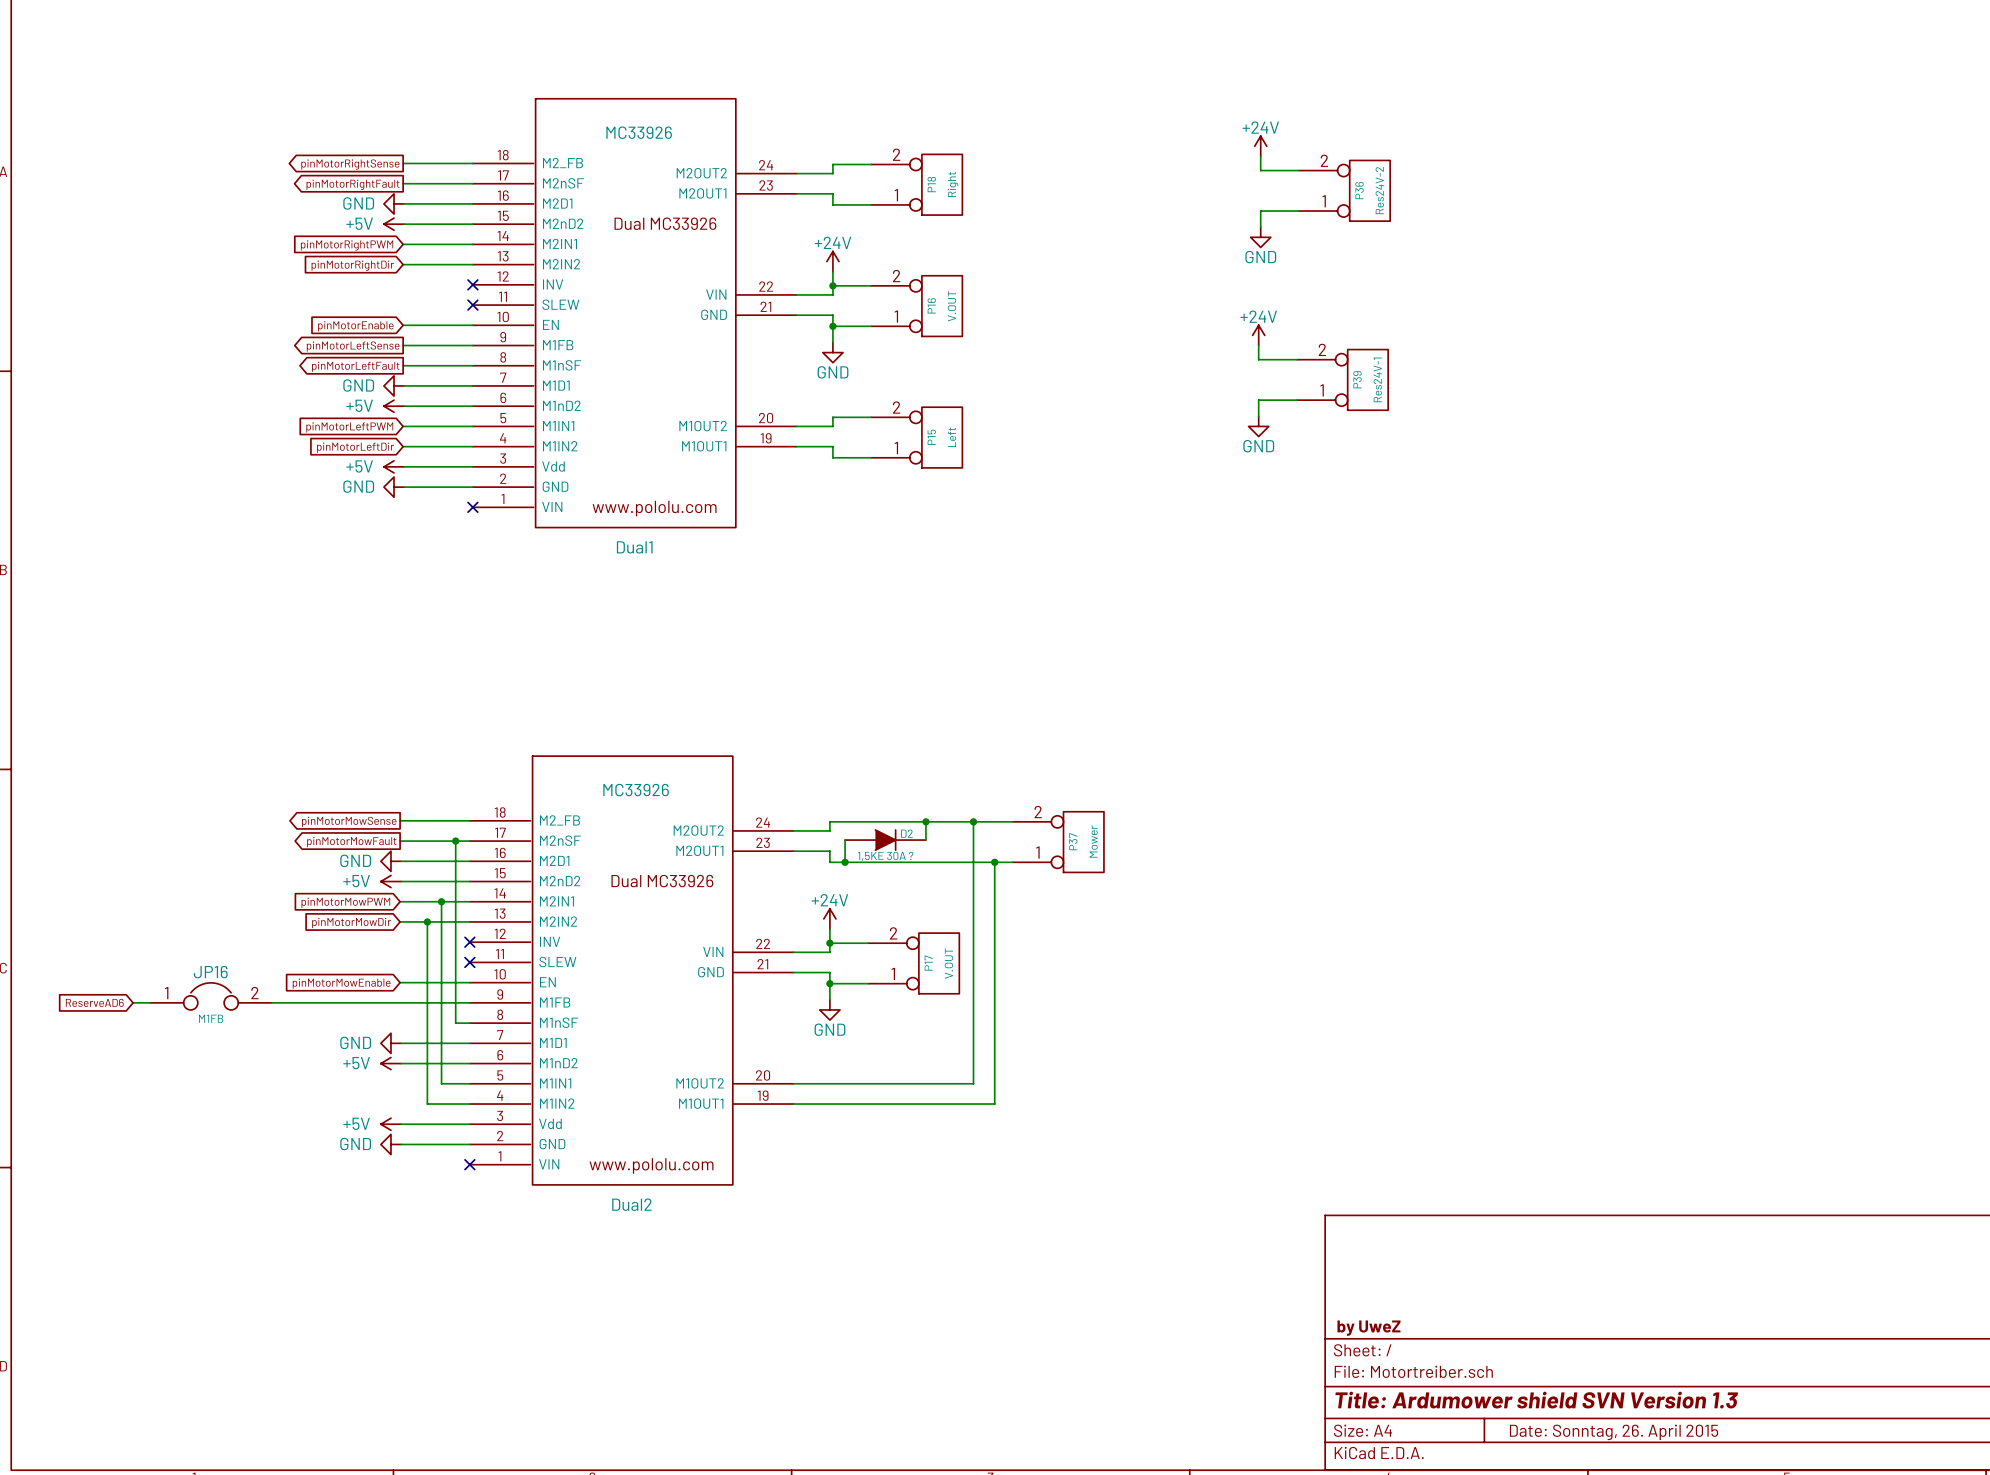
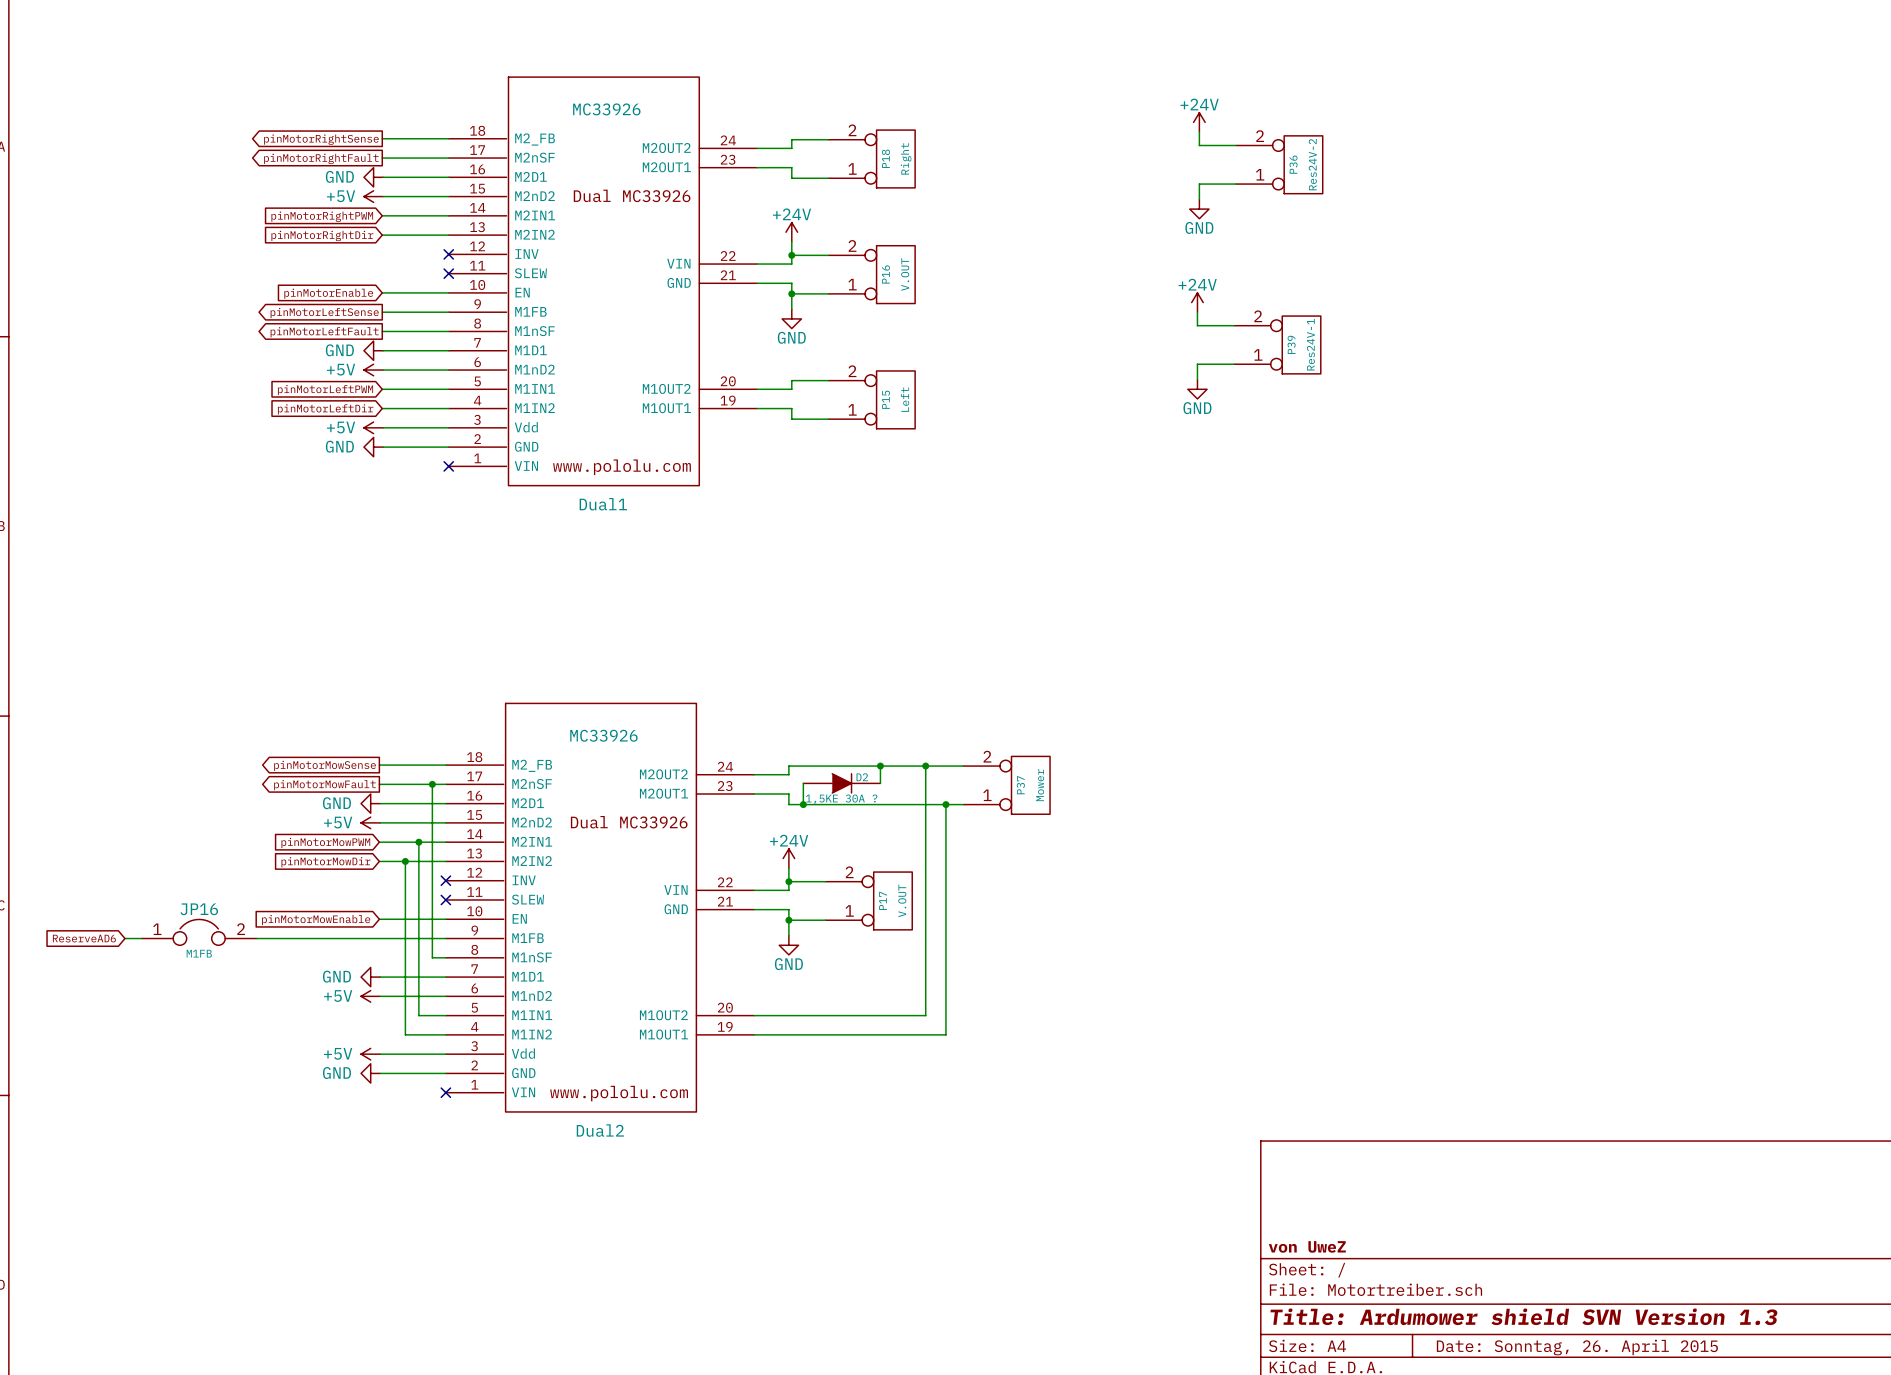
title block: by UweZ (1368, 1328) -> von UweZ (1307, 1246)

